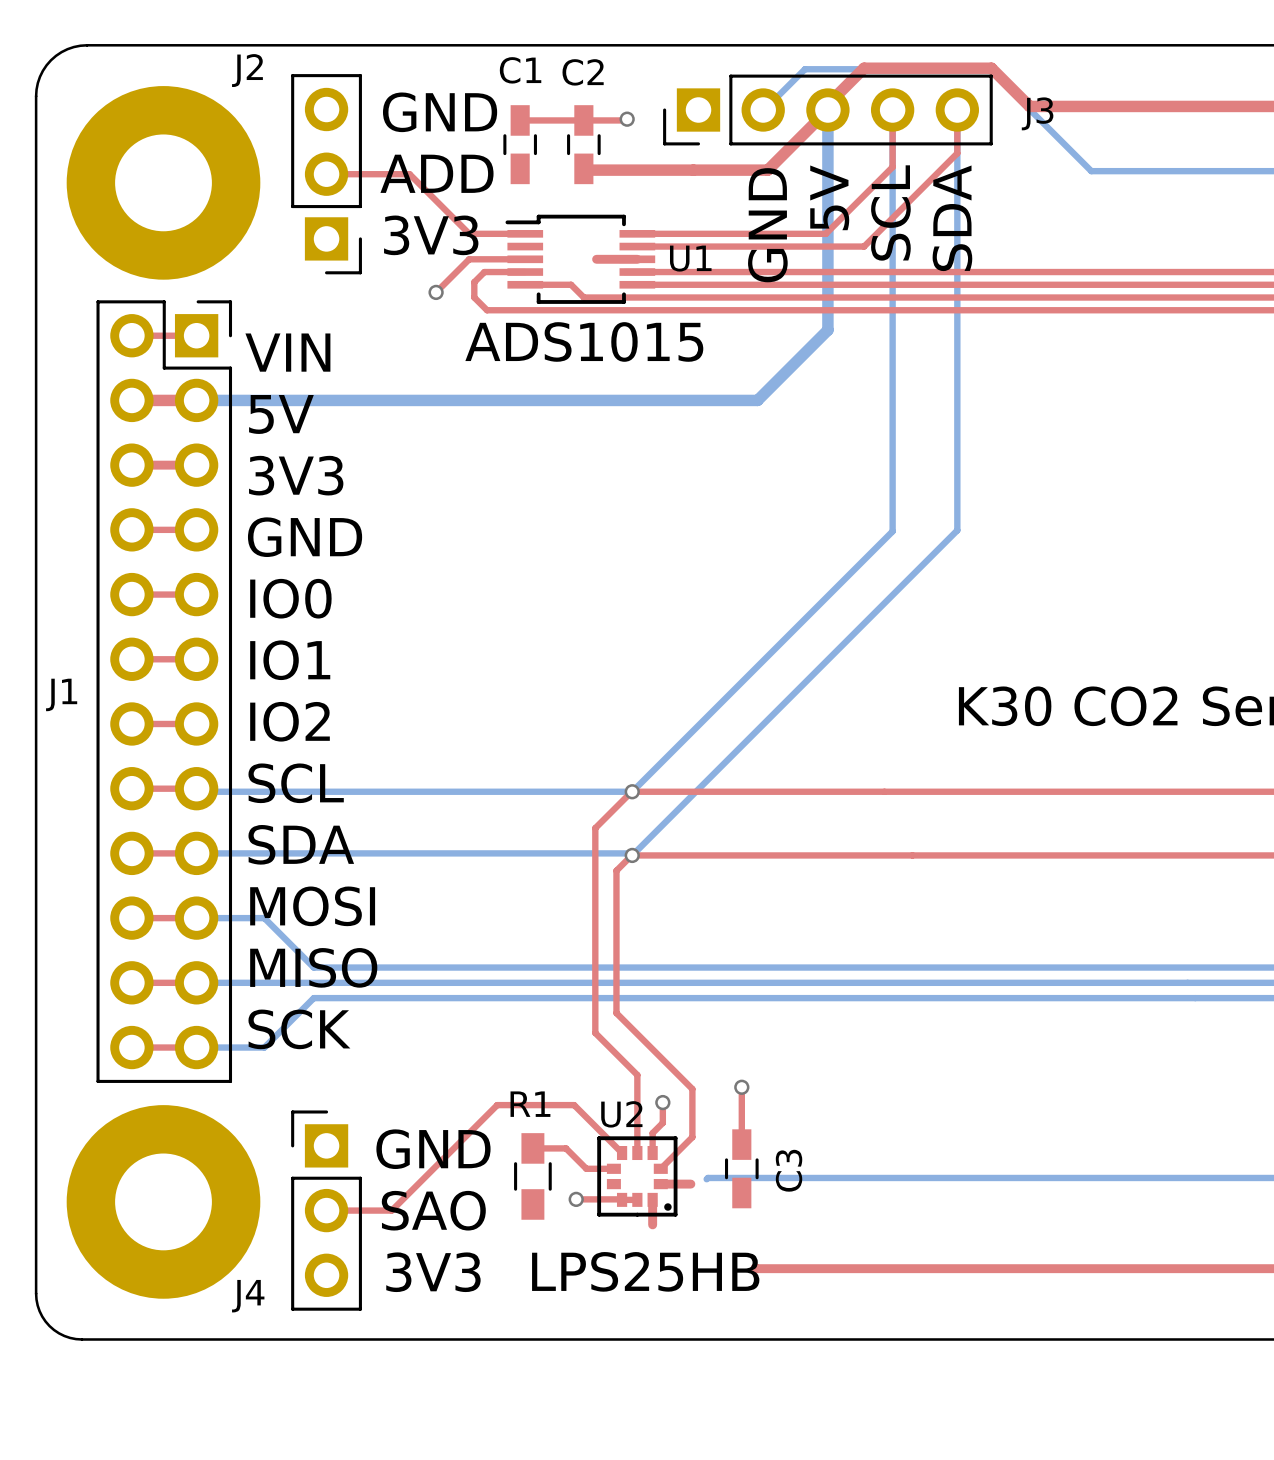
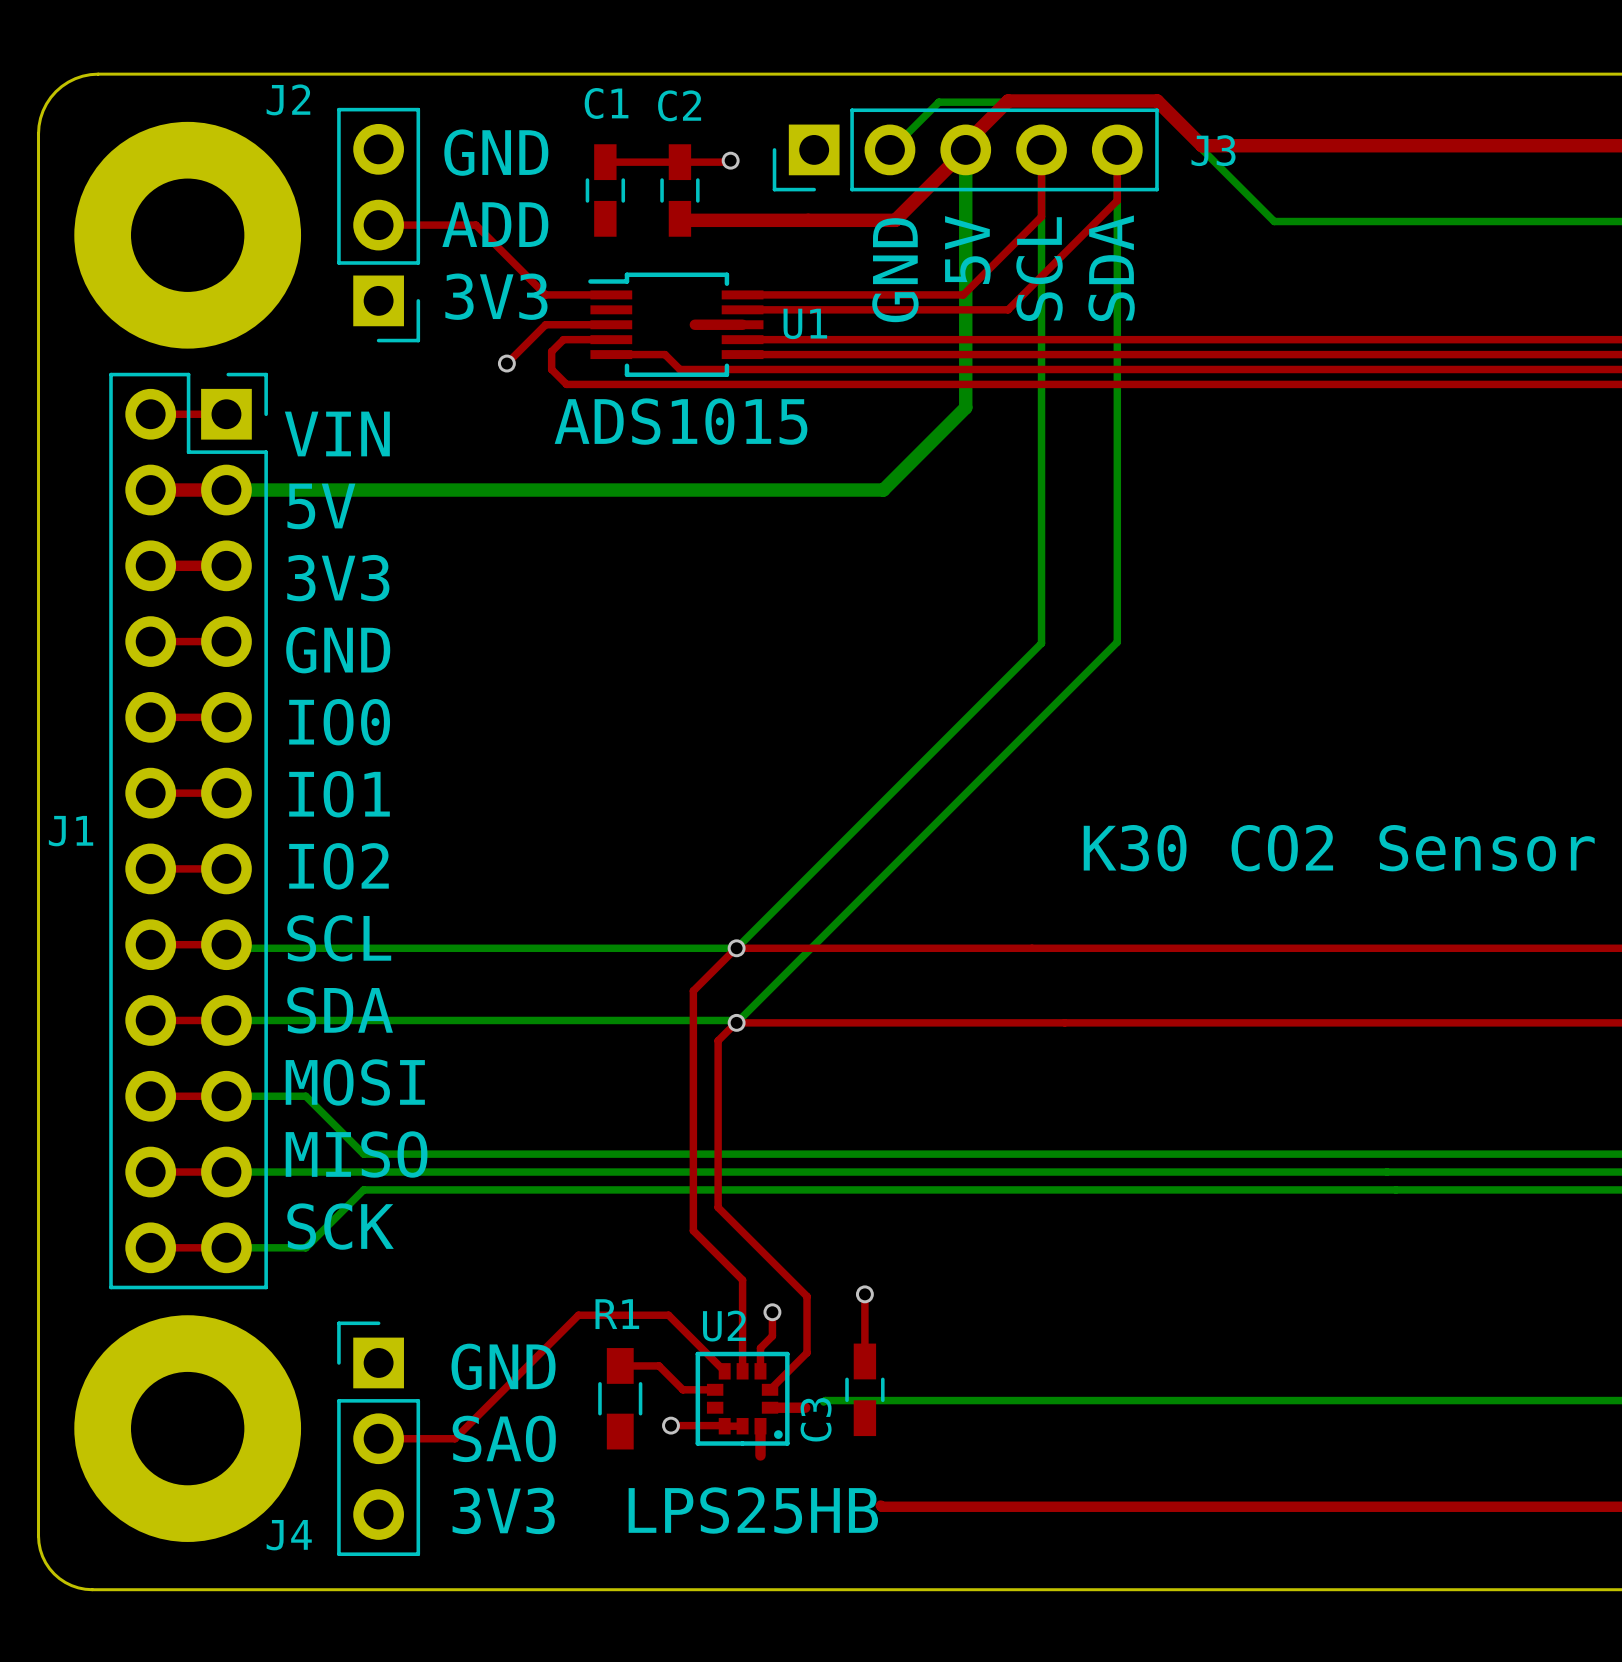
C3 name position: C3 (789, 1170) -> C3 (816, 1419)

